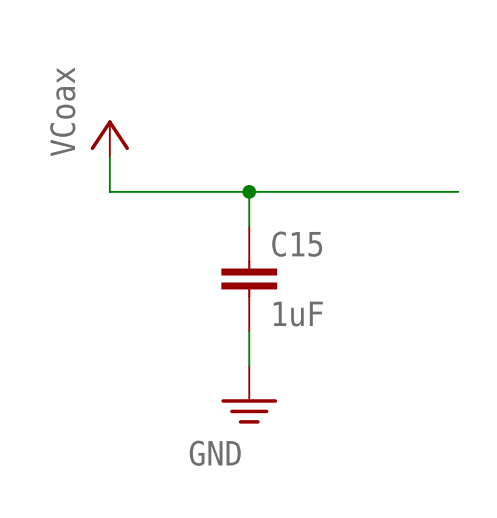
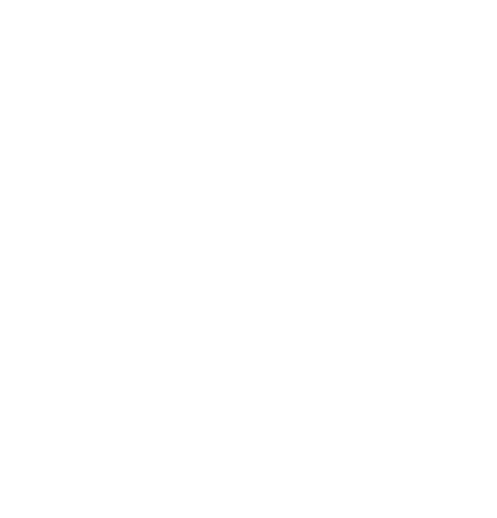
power symbol: VCoax (109, 138) -> none
wire: (109, 157) (109, 191) (458, 191) -> none
wire: (249, 191) (249, 226) -> none
junction: (249, 191) -> none
C15: 1uF (249, 279) -> none
wire: (249, 331) (249, 366) -> none
power symbol: GND (249, 394) -> none

